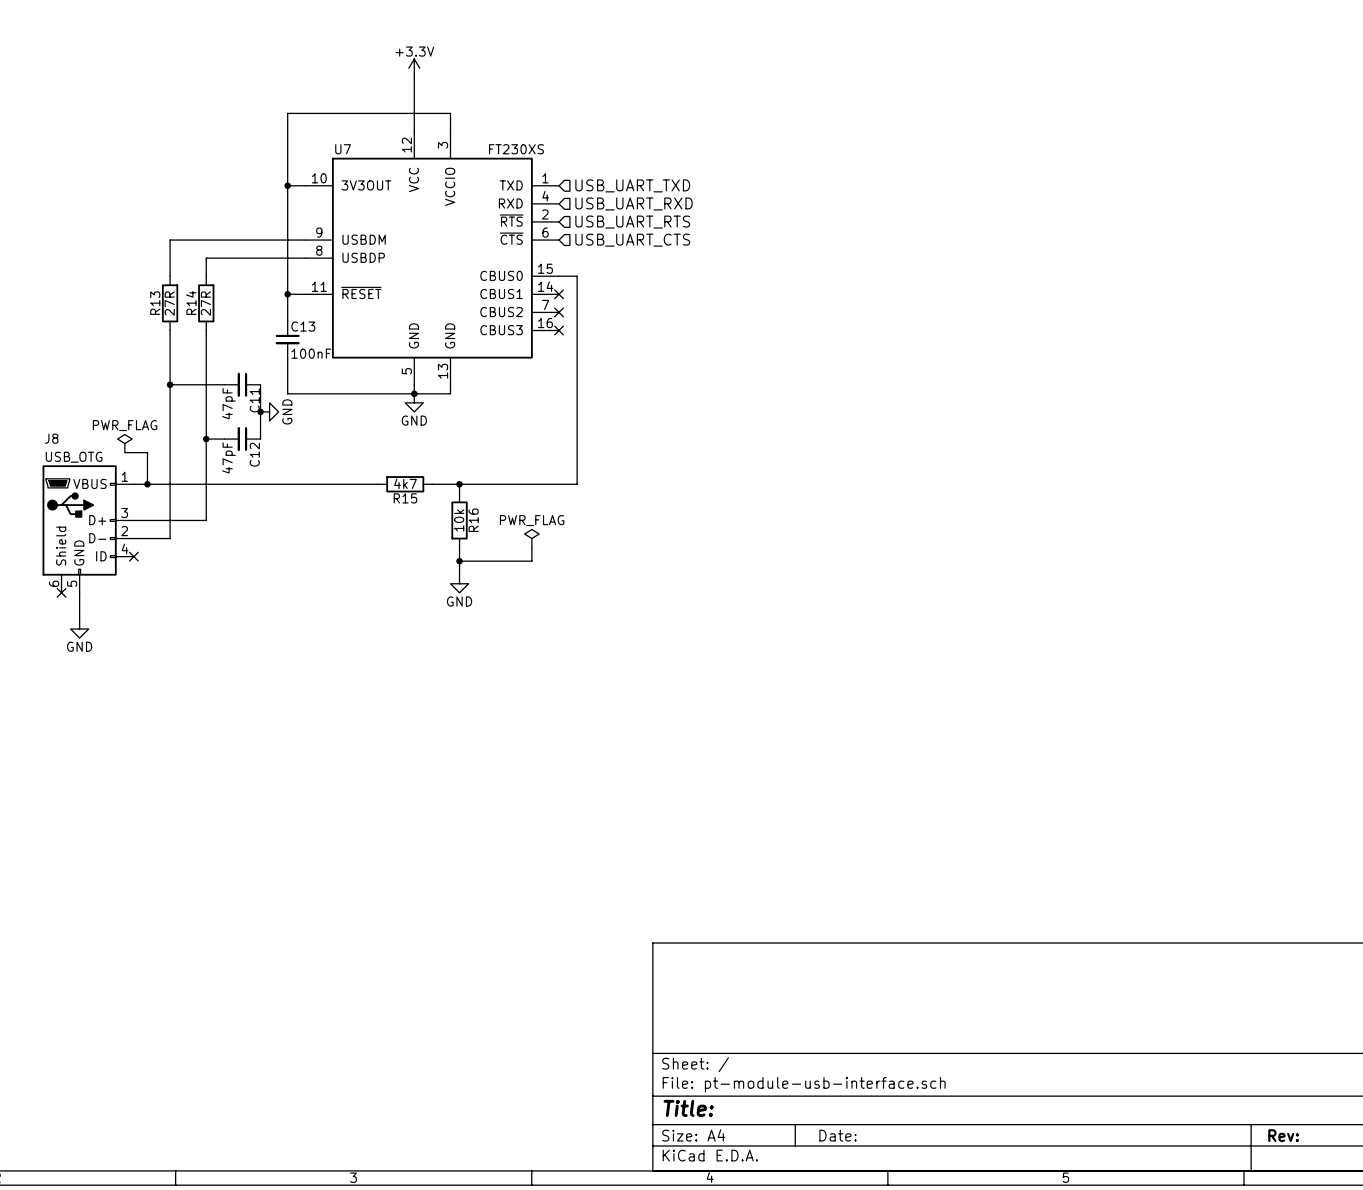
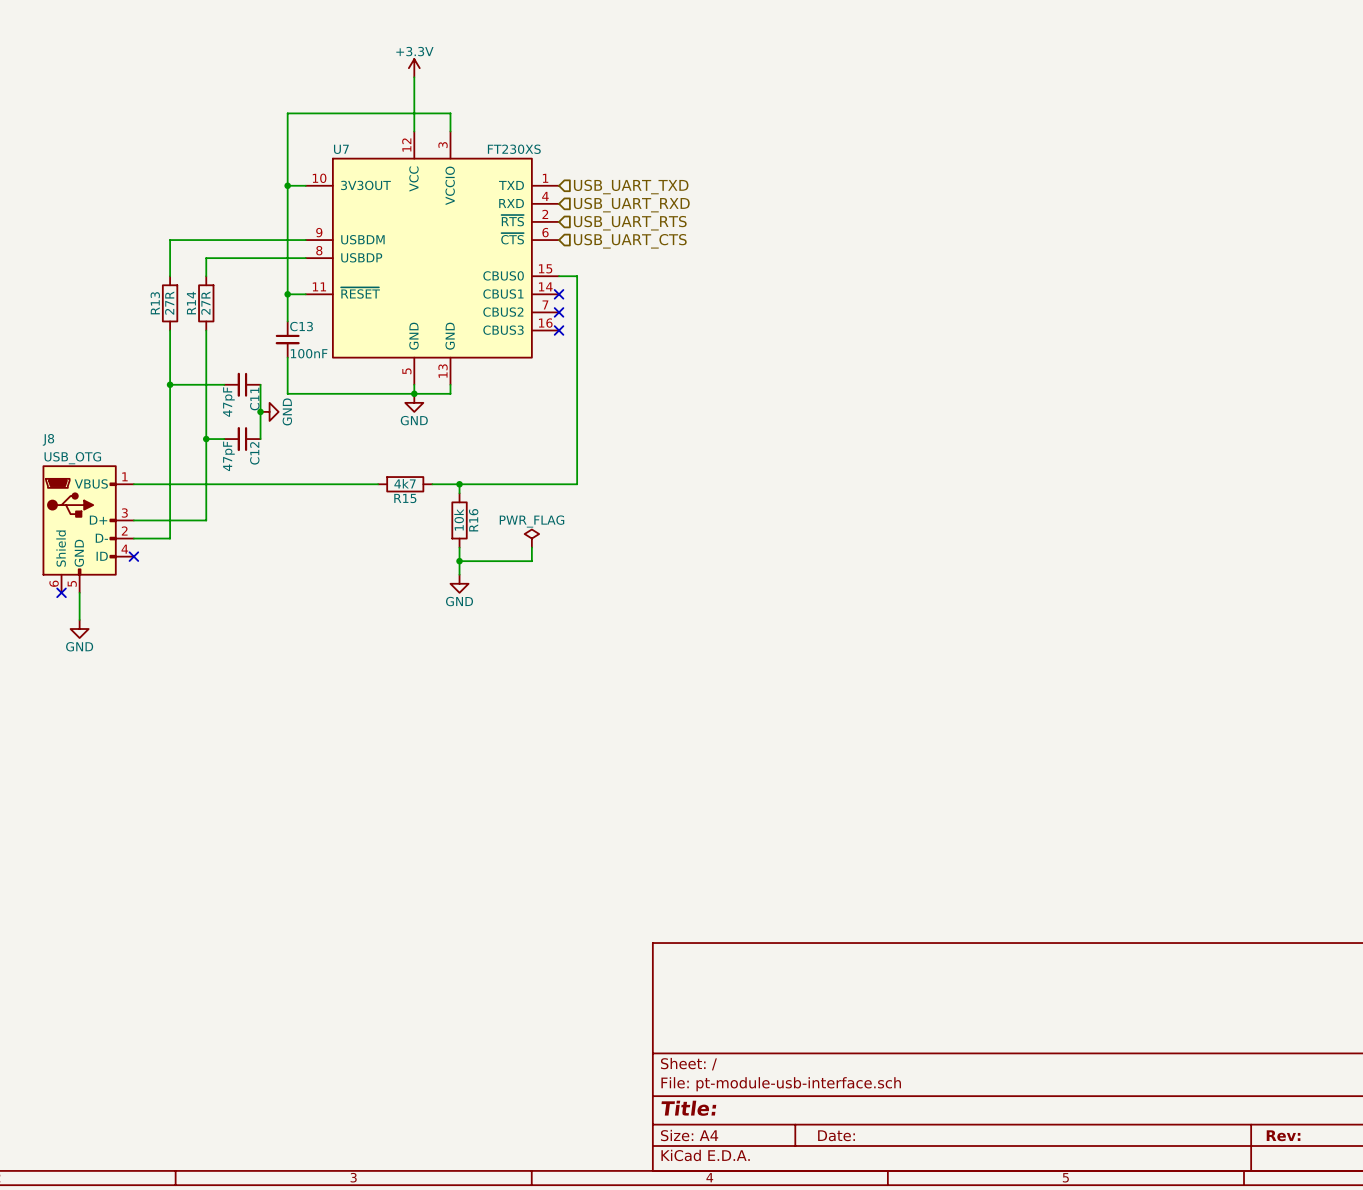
power symbol: PWR_FLAG (124, 443) -> none
wire: (124, 452) (147, 452) (147, 484) -> none
junction: (147, 484) -> none

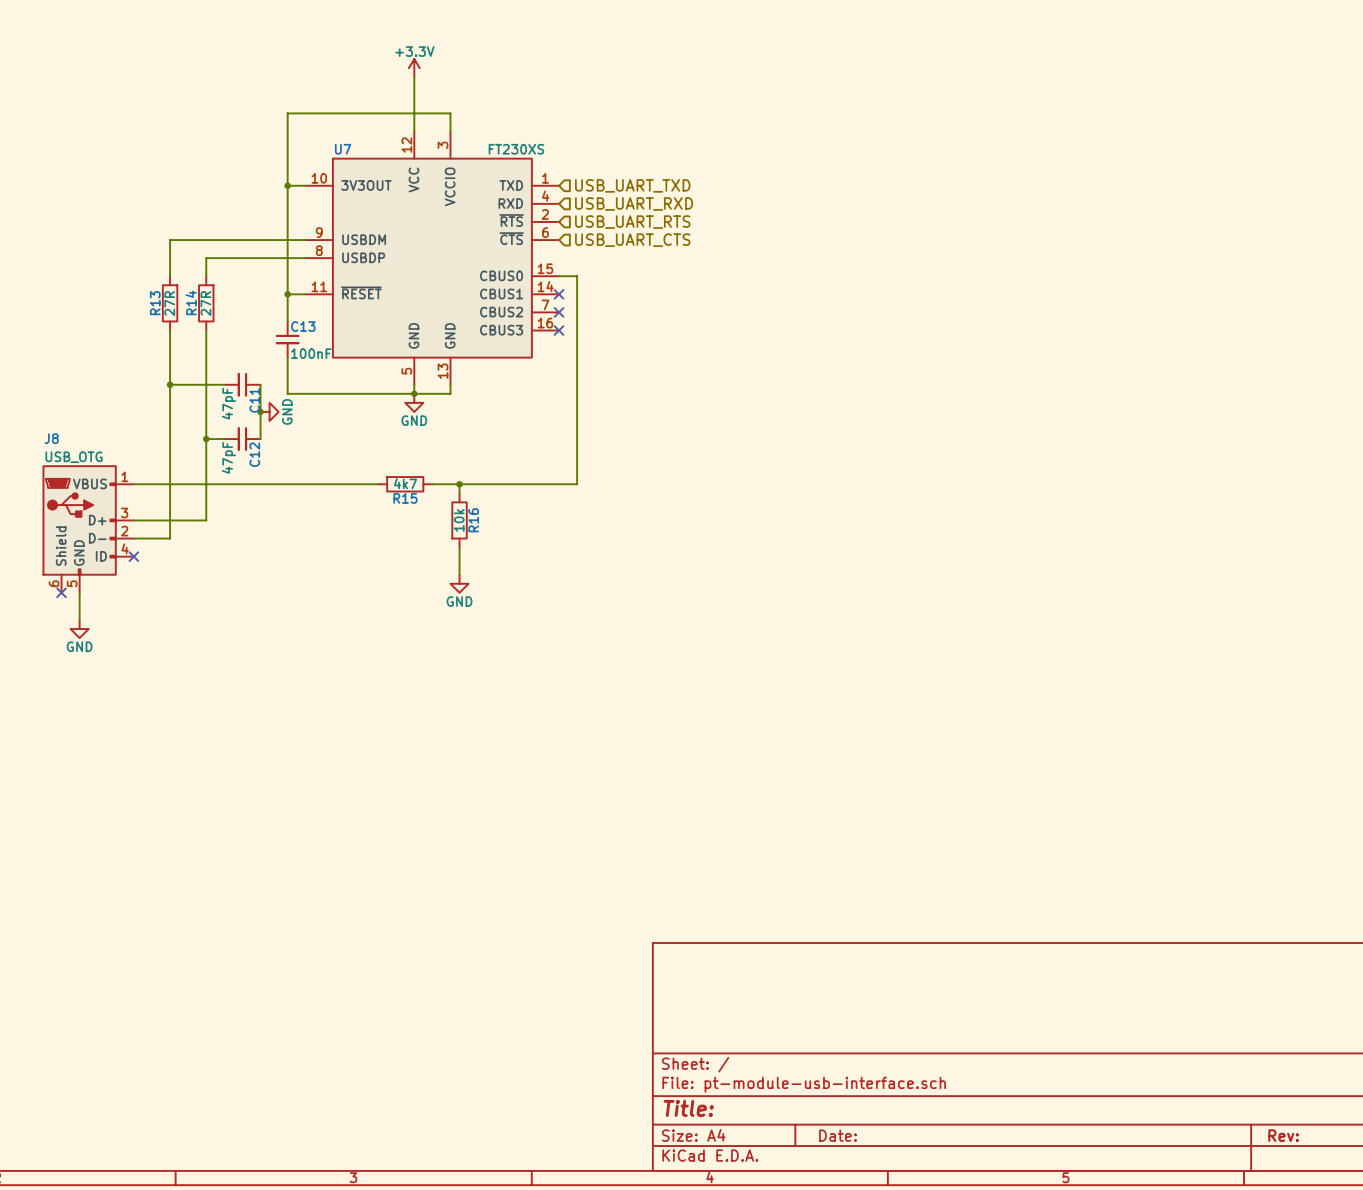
power symbol: PWR_FLAG (531, 538) -> none
wire: (531, 547) (531, 561) (459, 561) -> none
junction: (459, 561) -> none

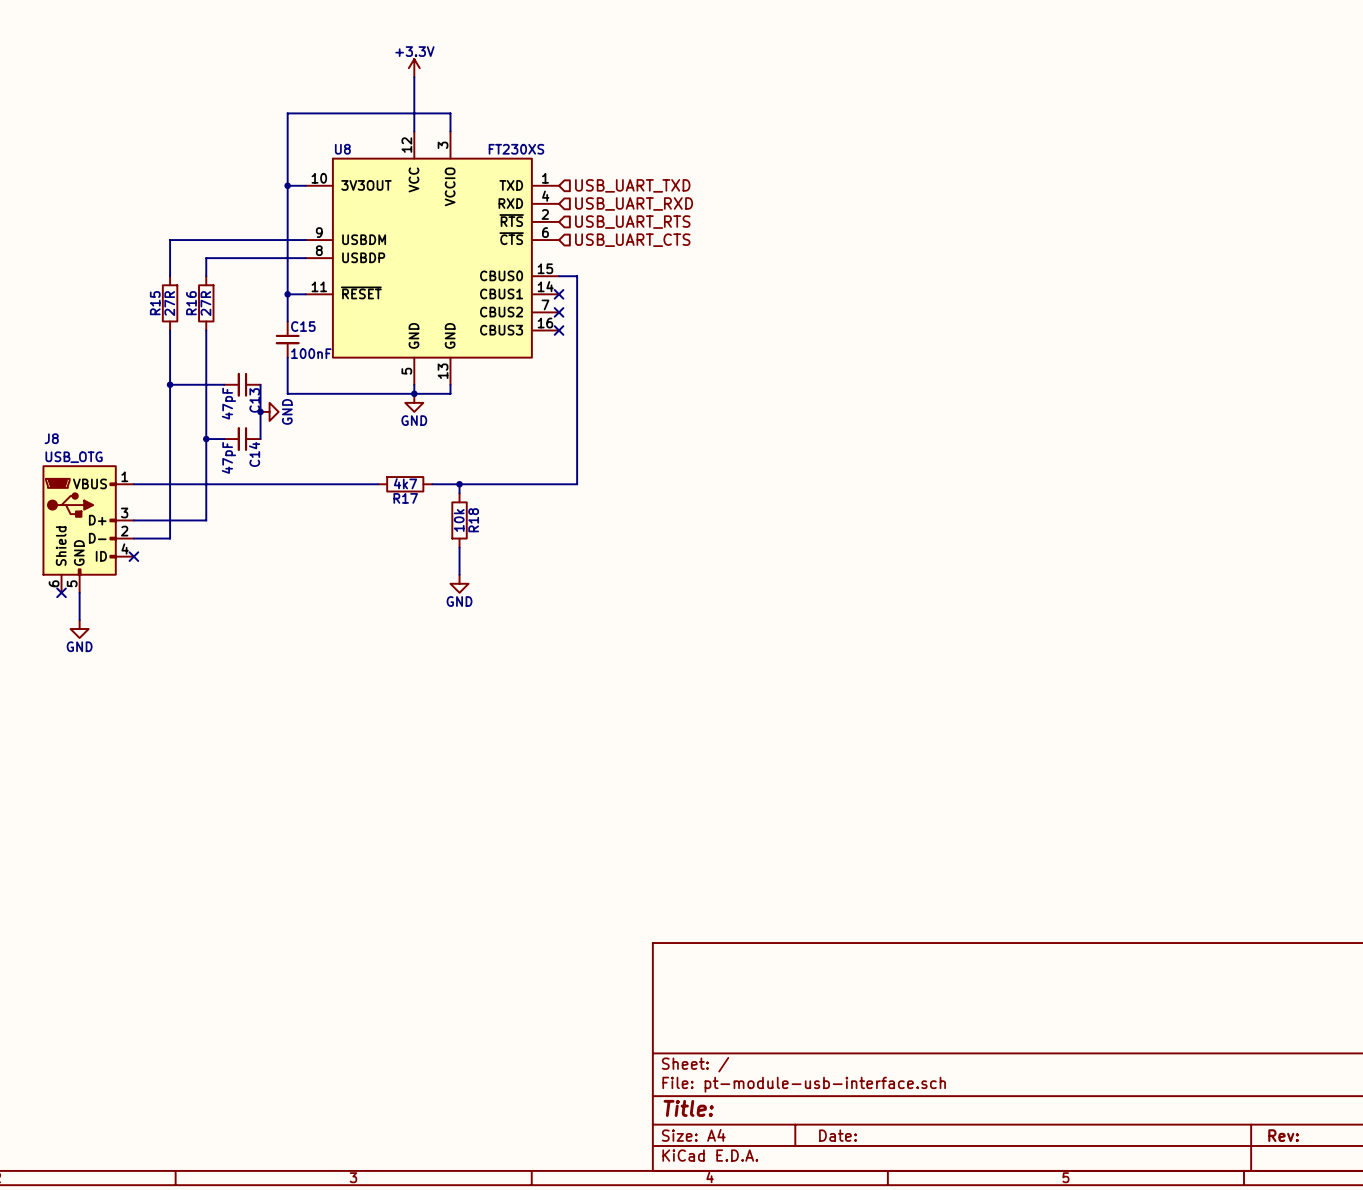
U7 name: U7 (343, 149) -> U8 (342, 149)
R14 name: R14 (191, 302) -> R16 (191, 303)
R13 name: R13 (155, 303) -> R15 (155, 303)
C13 name: C13 (303, 326) -> C15 (303, 326)
C11 name: C11 (254, 400) -> C13 (254, 400)
C12 name: C12 (254, 454) -> C14 (254, 454)
R15 name: R15 (405, 498) -> R17 (405, 498)
R16 name: R16 (473, 520) -> R18 (473, 520)

